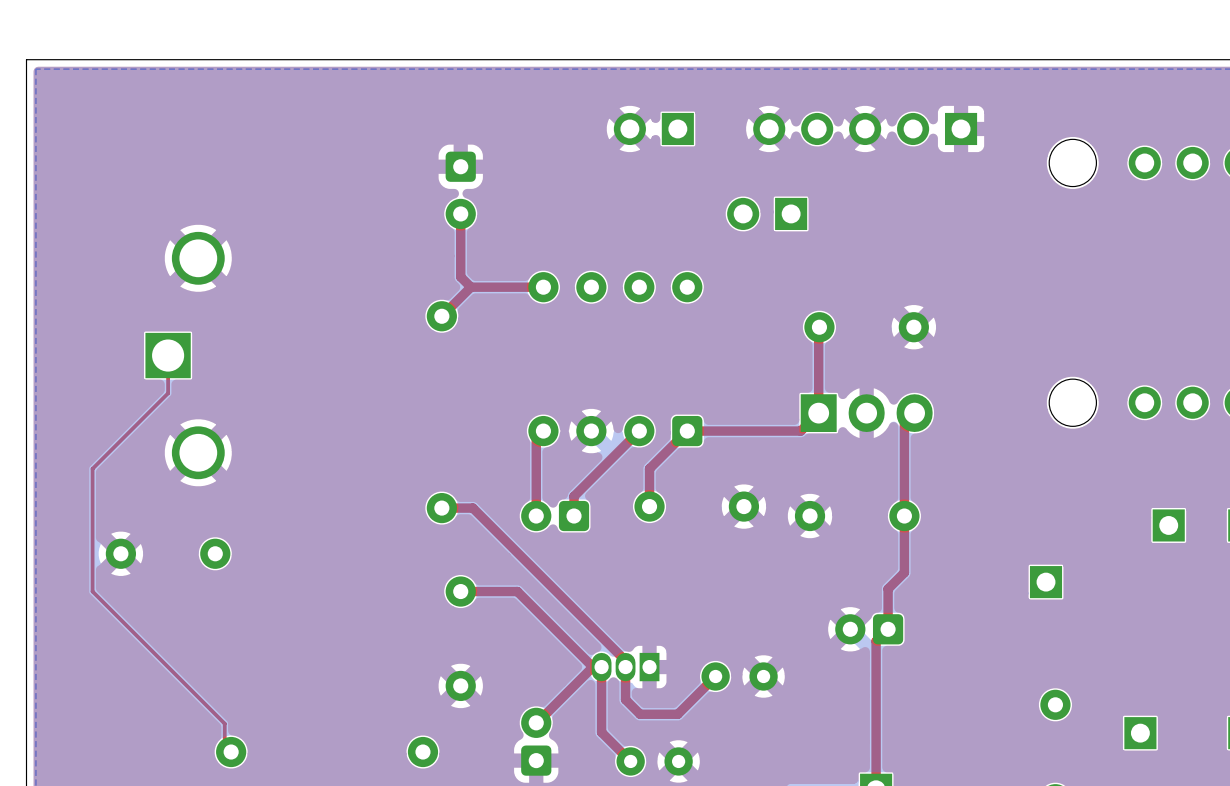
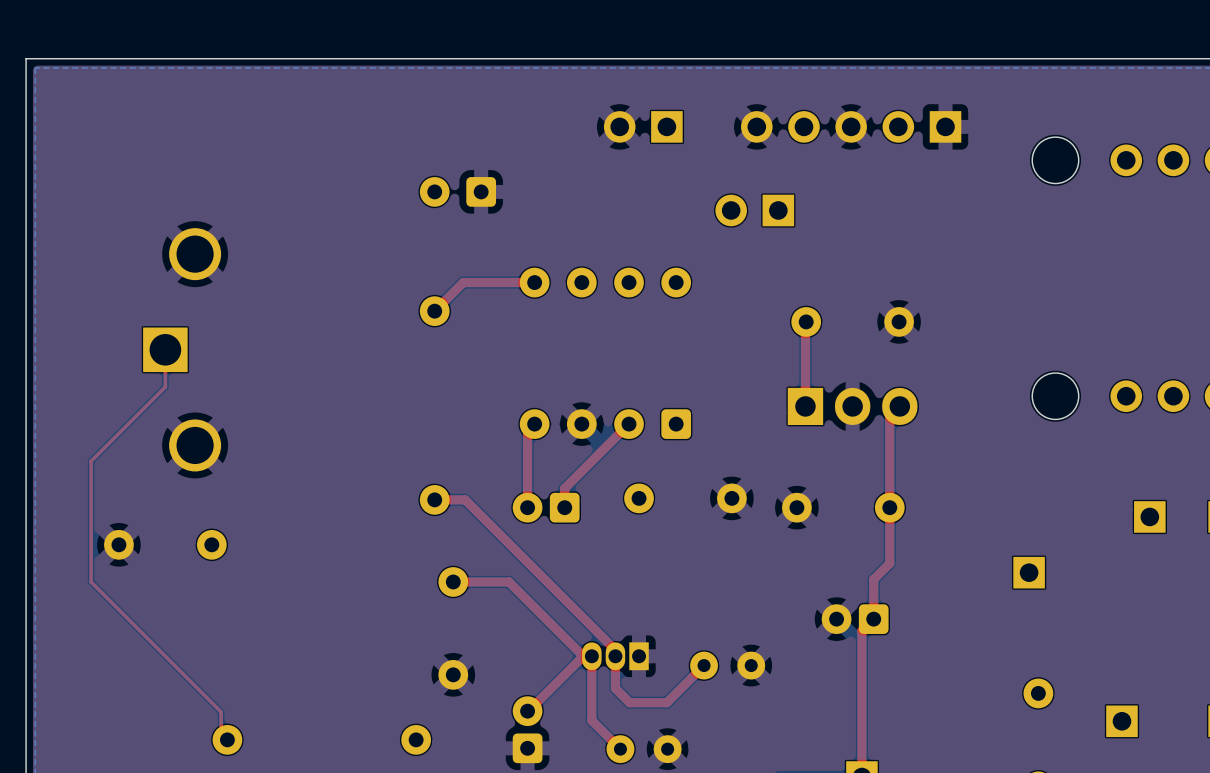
part rotation: 0° (460, 190) -> 90° clockwise (457, 191)
top track: (460, 213) (460, 277) (470, 287) -> none
top track: (818, 413) (800, 431) (687, 431) (649, 468) (649, 506) -> none

